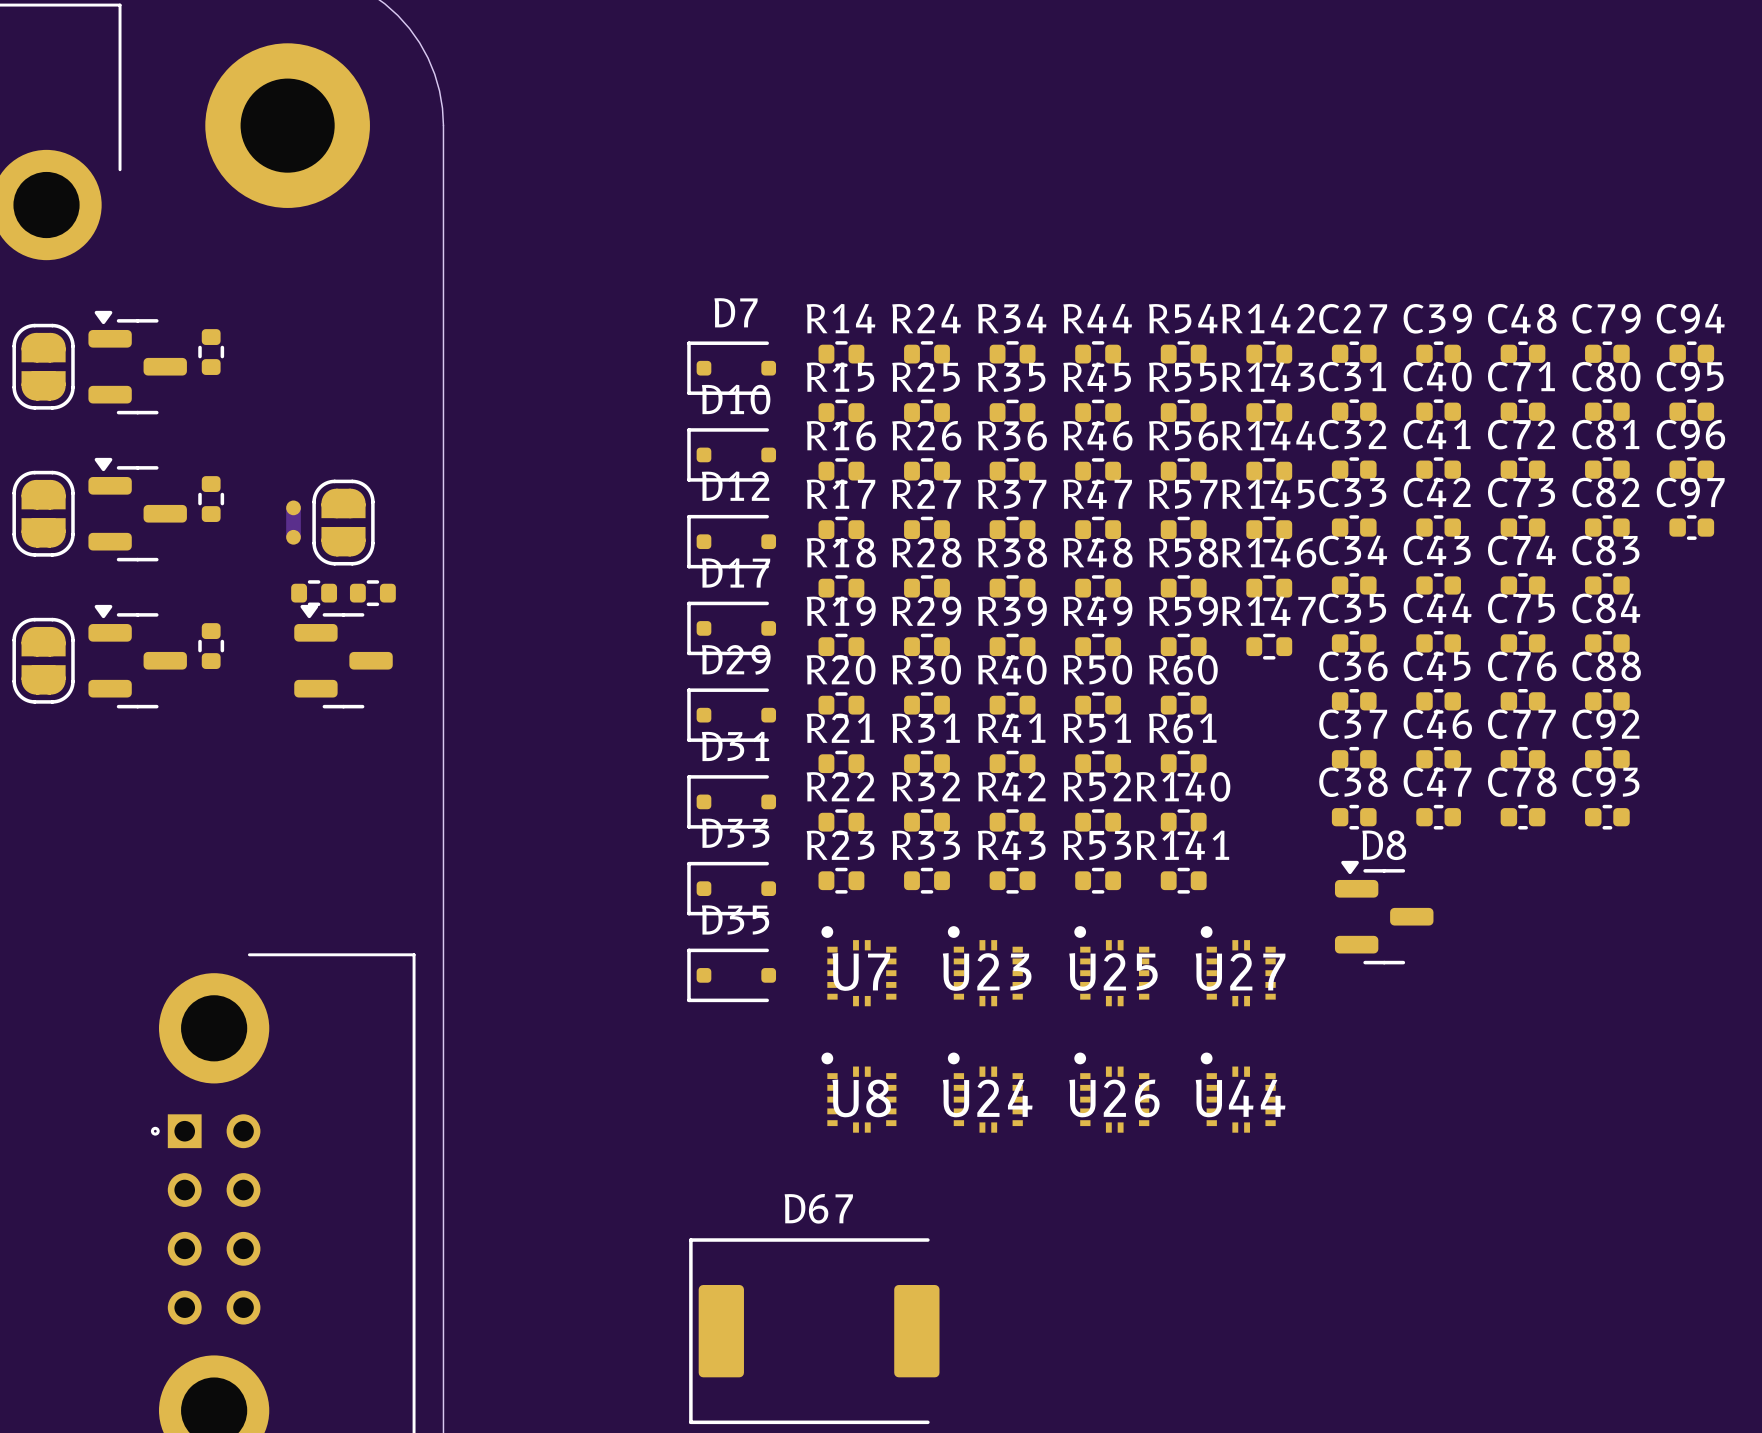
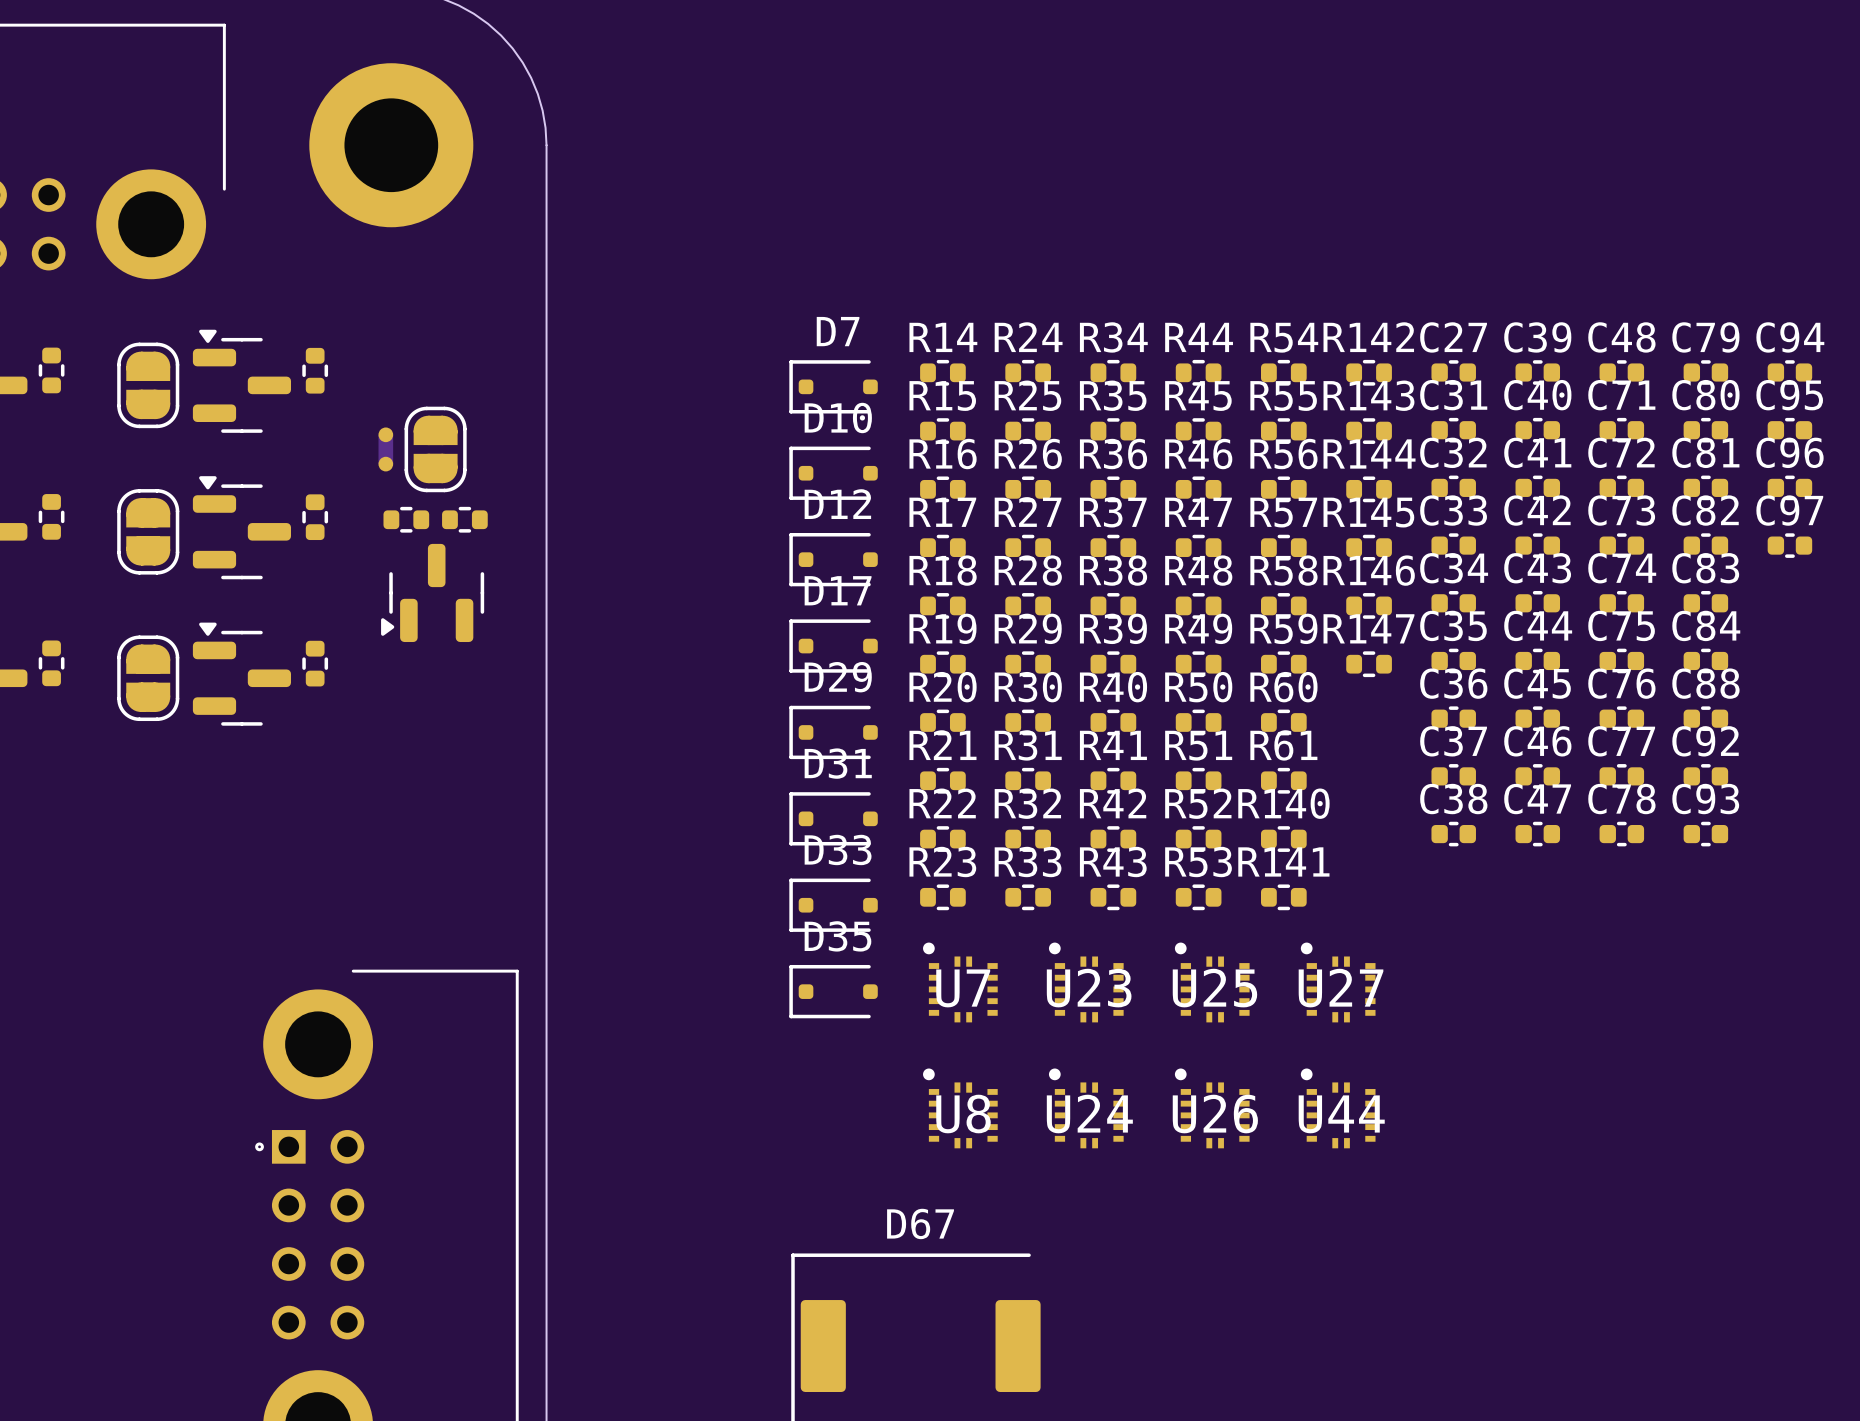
part: none -> (406, 519)
part: none -> (464, 519)
part position: (293, 522) -> (385, 449)
part position: (343, 522) -> (435, 449)
part: (314, 593) -> none
part: (372, 593) -> none
part rotation: 0° (343, 656) -> 90° counterclockwise (432, 592)
part position: (343, 656) -> (432, 592)
D8: (1384, 912) -> none

